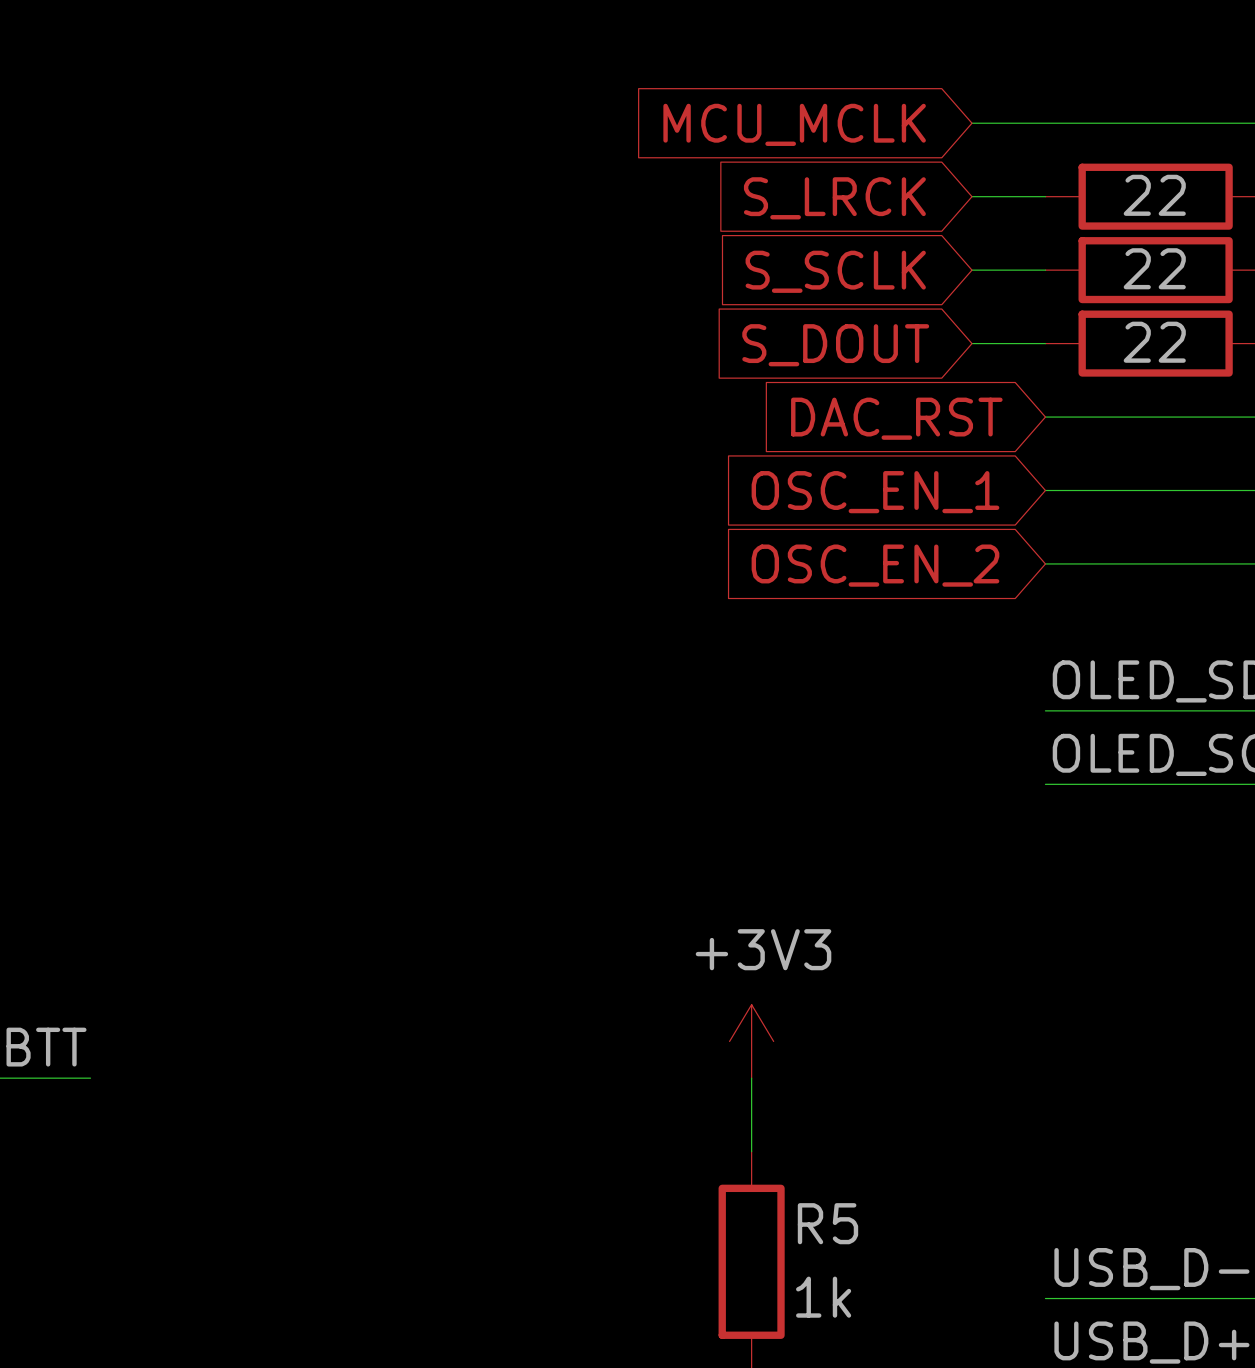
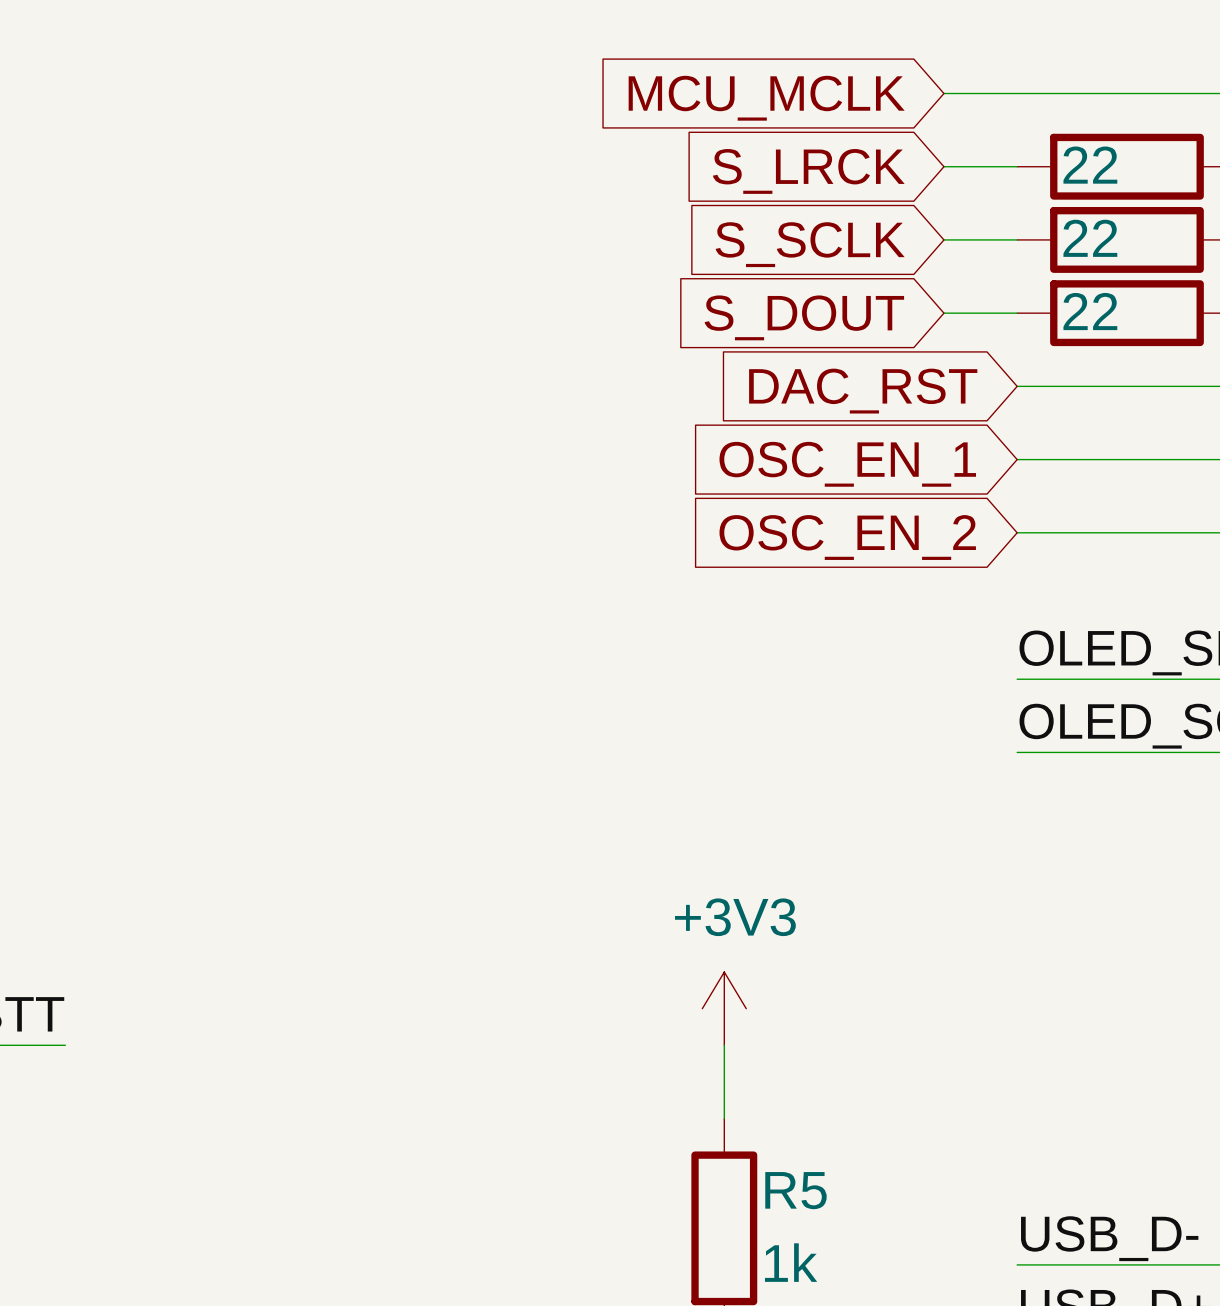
part value position: 22 (1154, 195) -> 22 (1090, 165)
part value position: 22 (1154, 268) -> 22 (1090, 238)
part value position: 22 (1154, 342) -> 22 (1090, 311)

